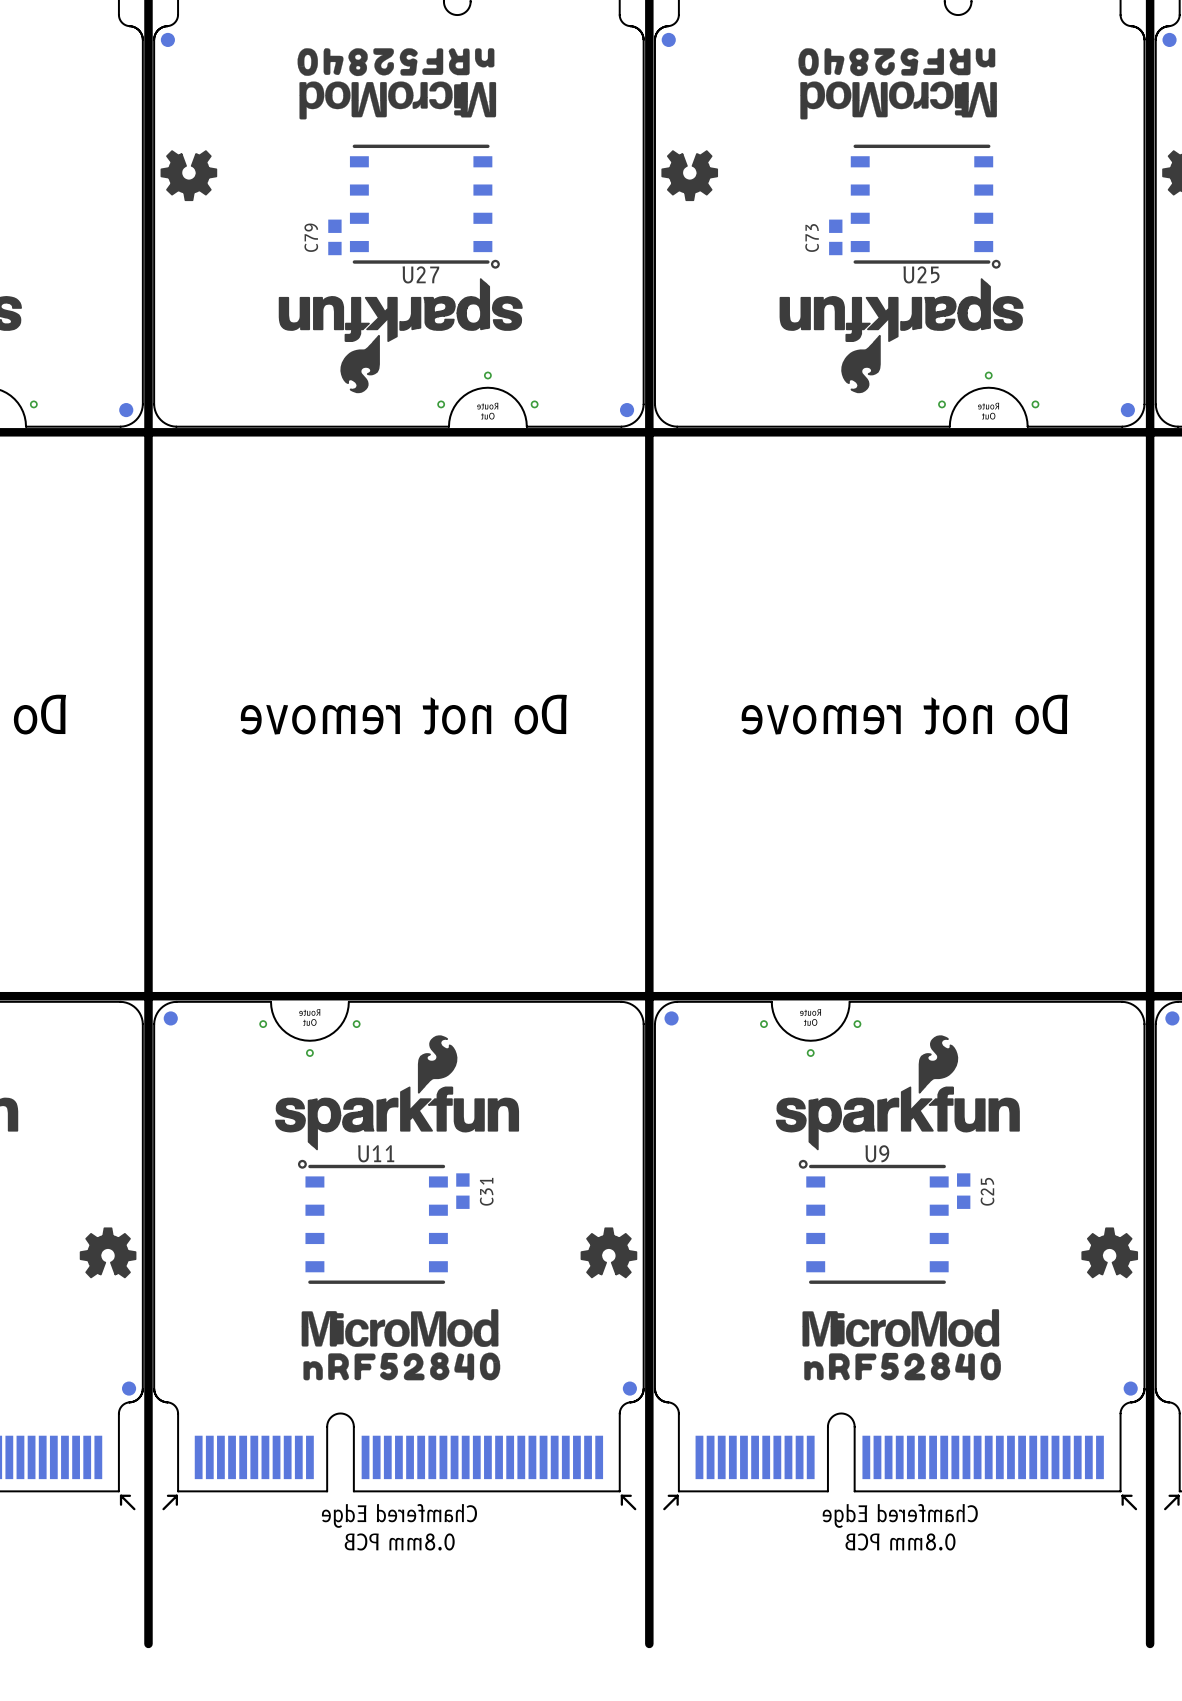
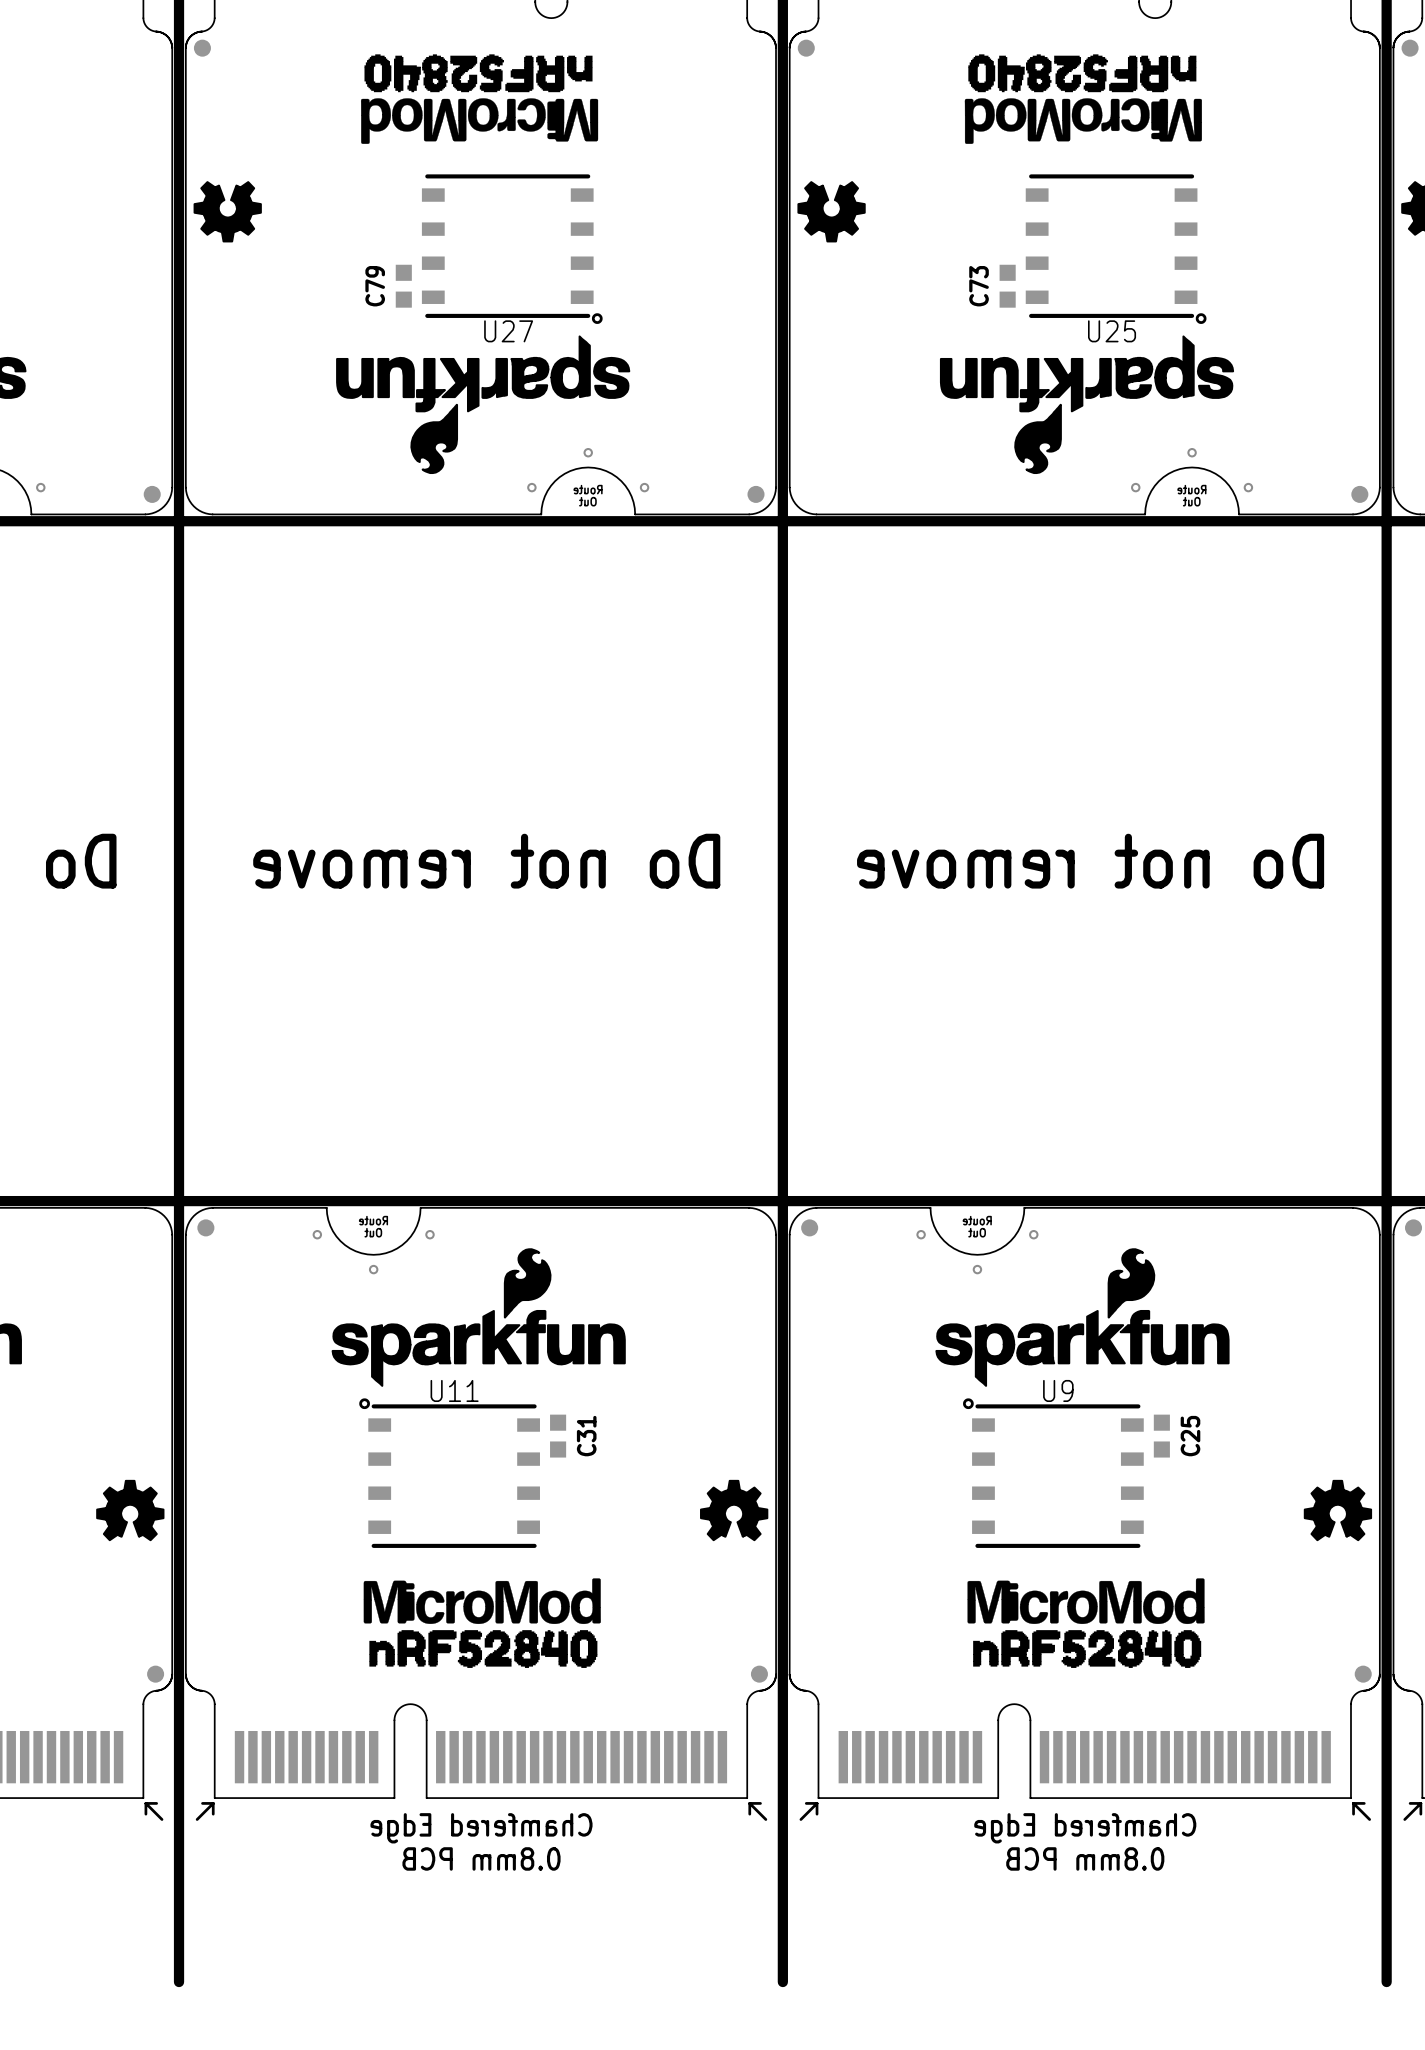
drawing shape: [297, 48, 495, 77] -> [364, 54, 593, 93]
drawing shape: [798, 48, 996, 77] -> [968, 54, 1197, 93]
drawing shape: [303, 1352, 501, 1381] -> [369, 1630, 598, 1668]
drawing shape: [804, 1352, 1001, 1381] -> [973, 1630, 1202, 1668]

